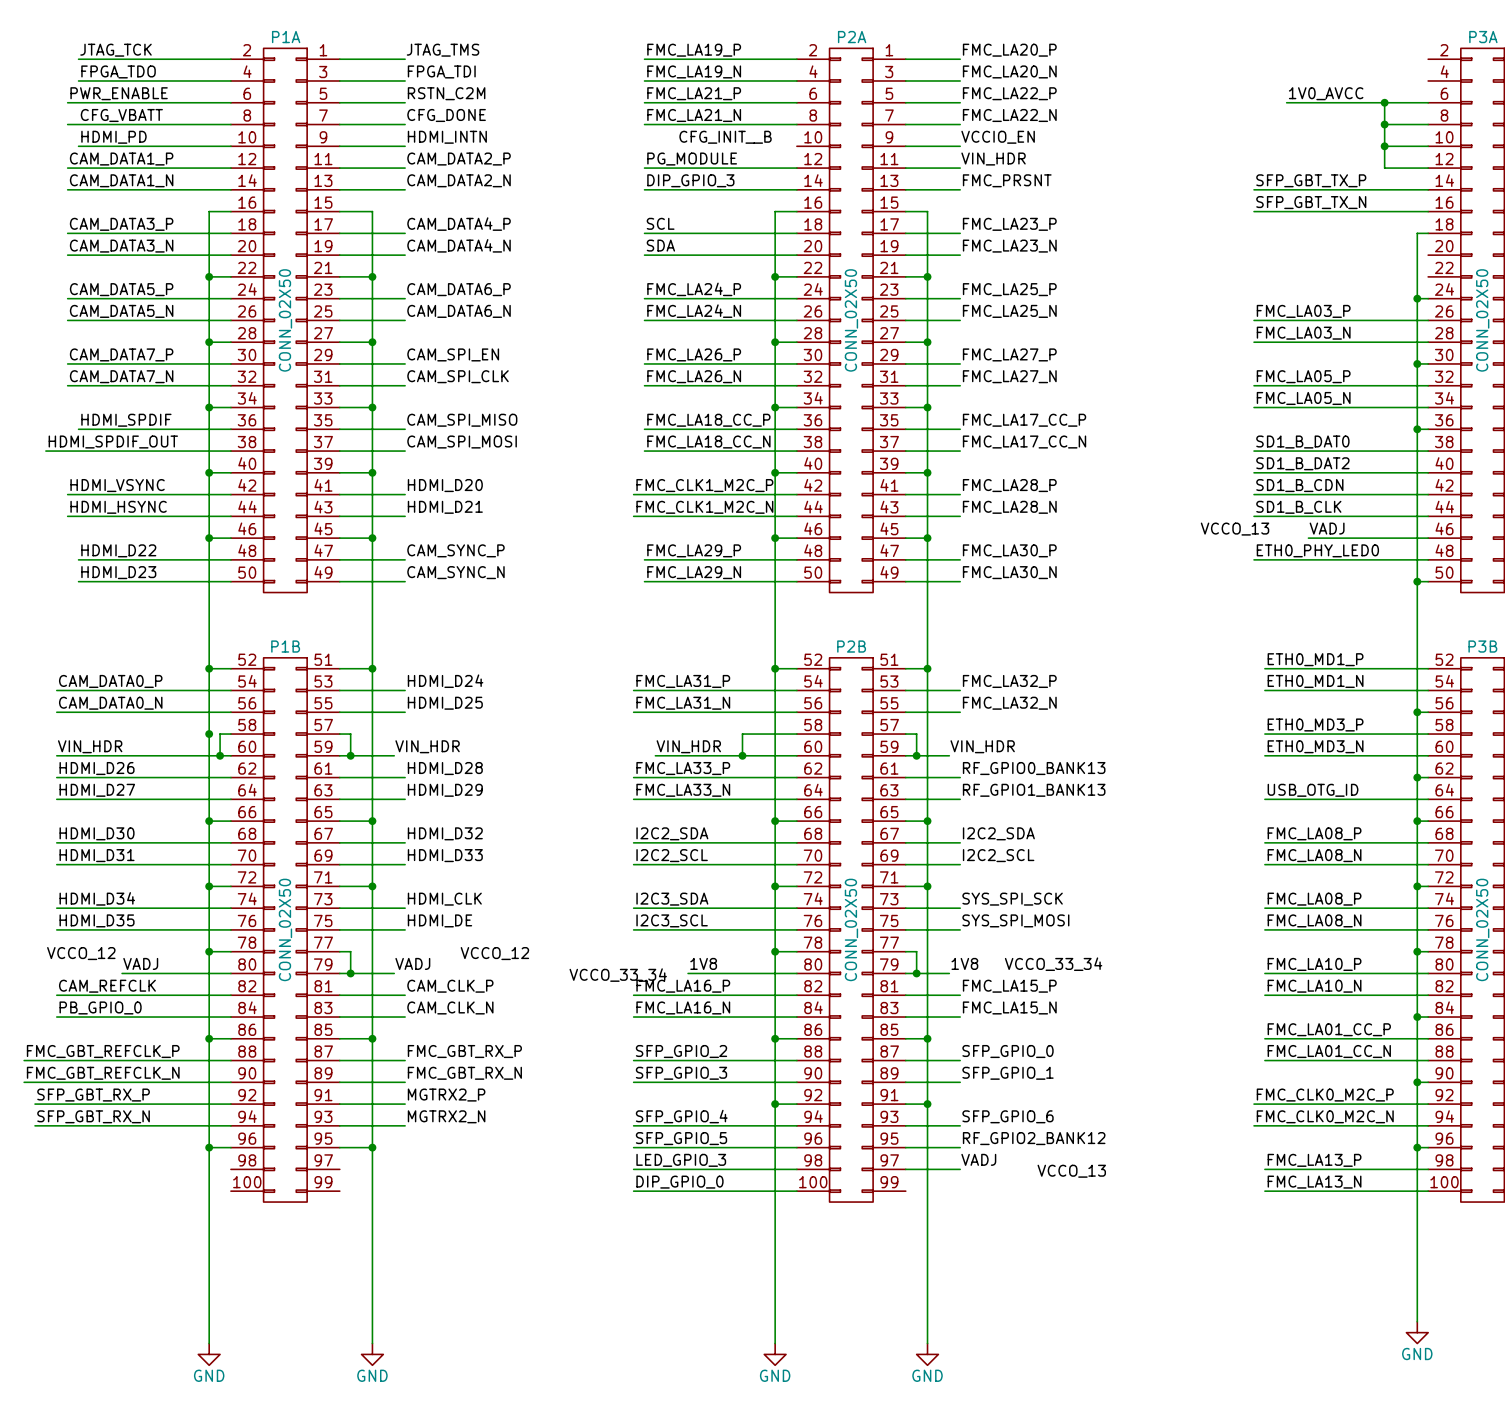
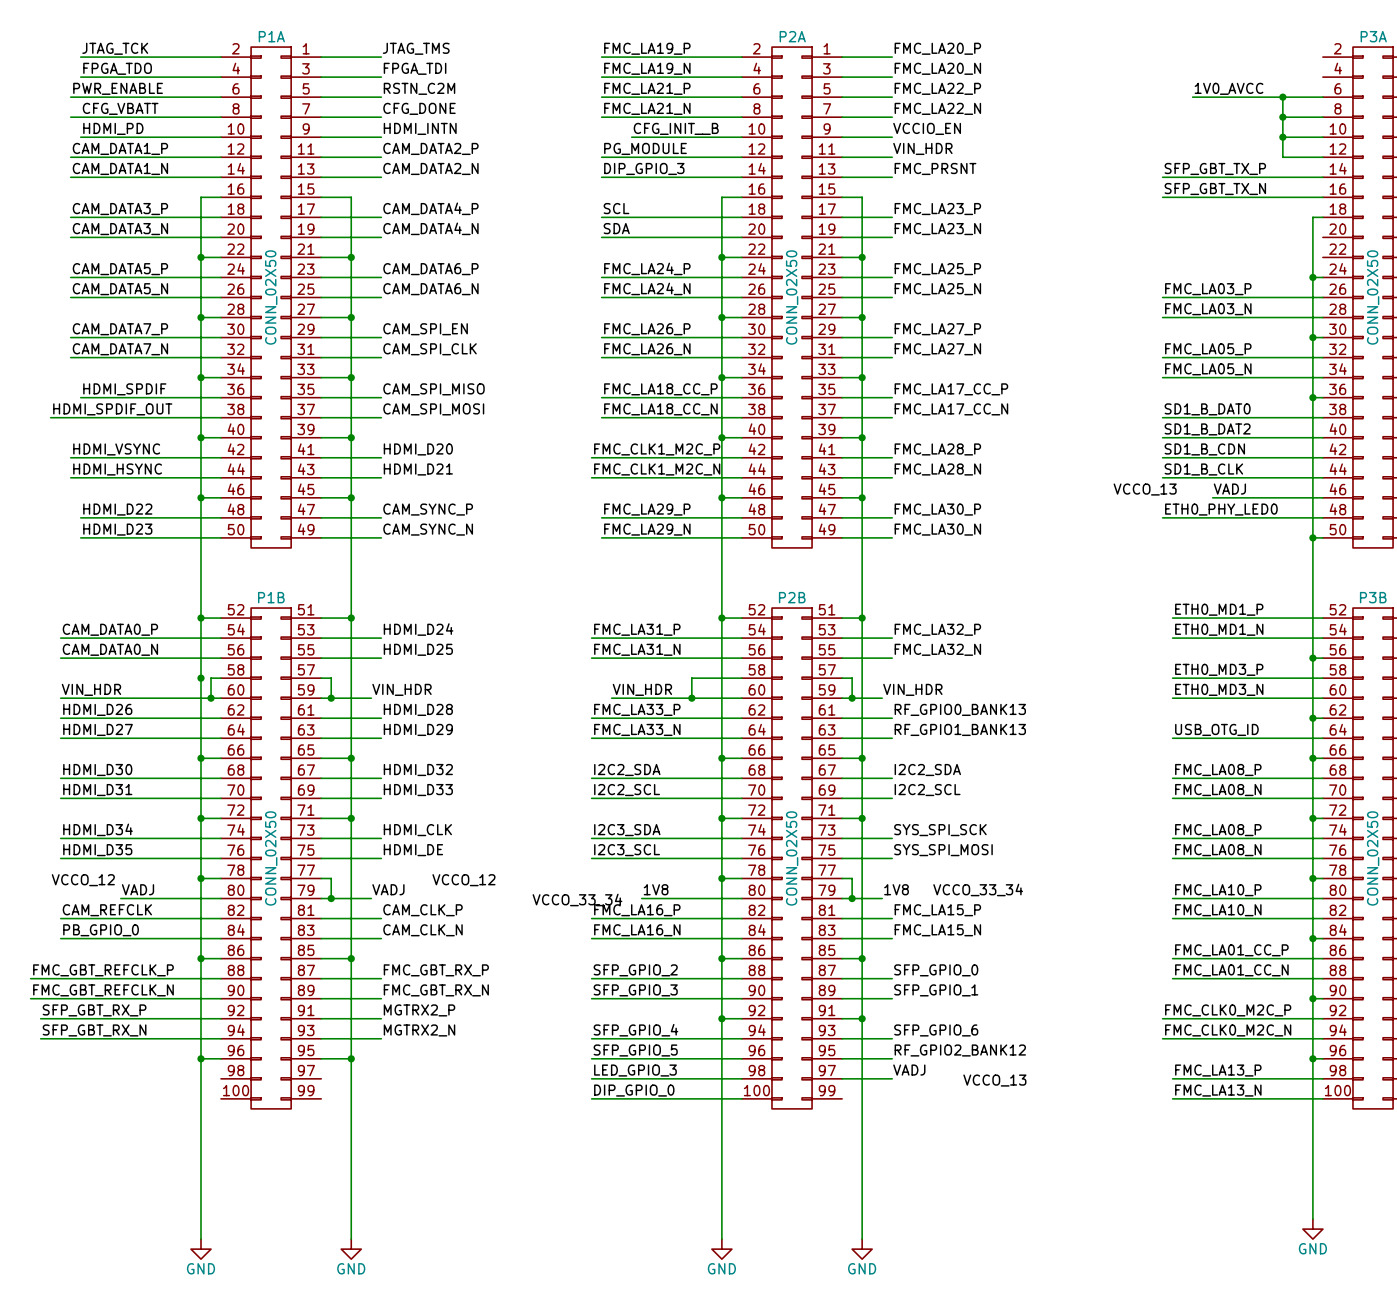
wire: none -> (631, 137) (741, 137)

